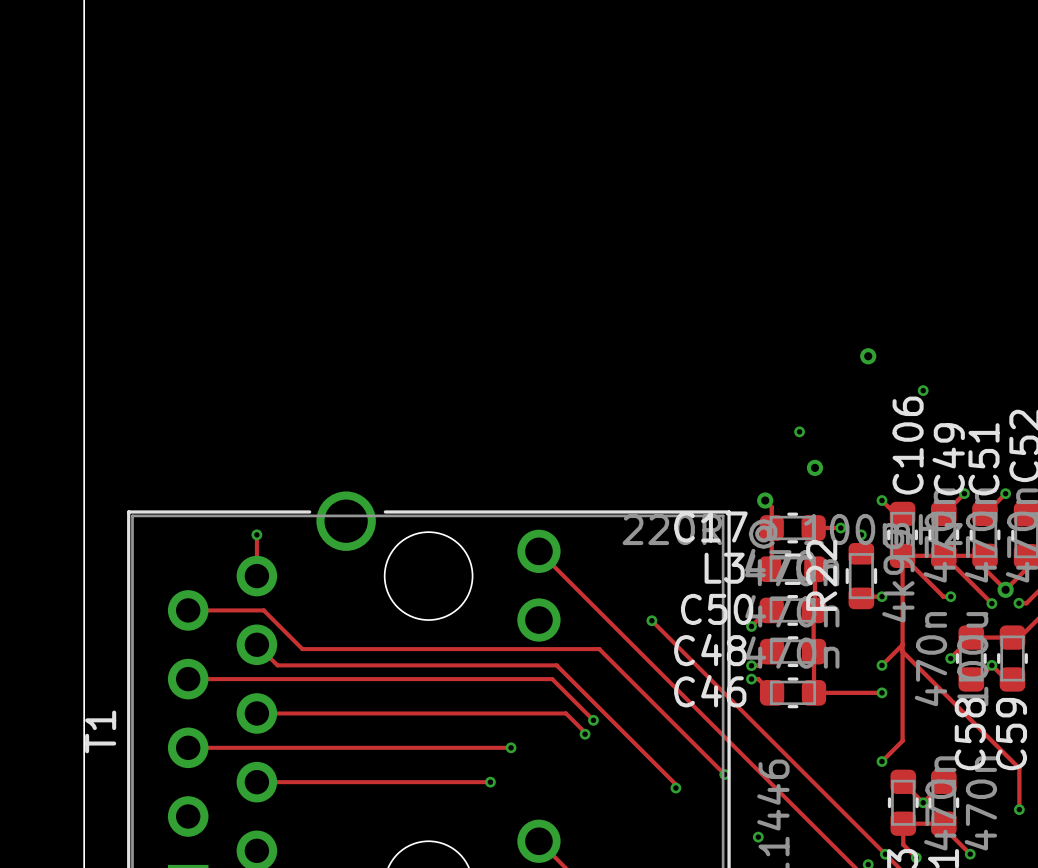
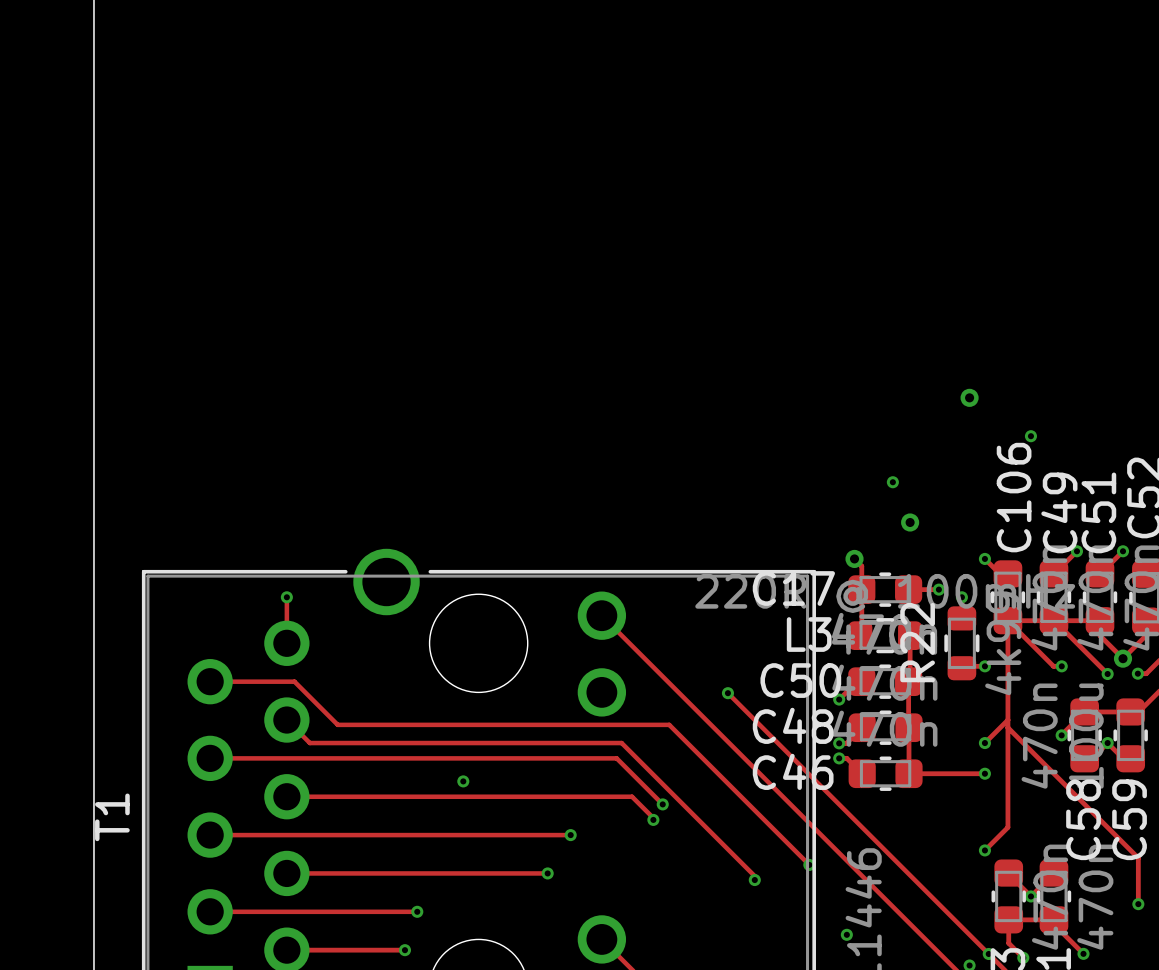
via: none -> (463, 781)
track: none -> (210, 911) (417, 911)
via: none -> (417, 911)
track: none -> (286, 950) (404, 950)
via: none -> (404, 950)

